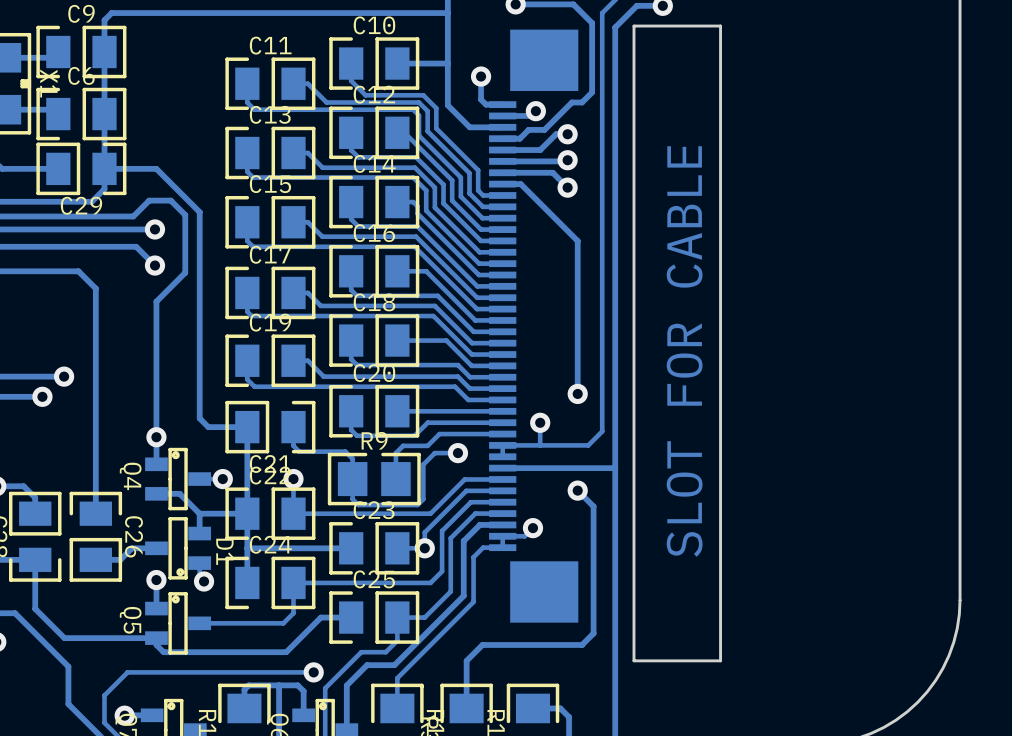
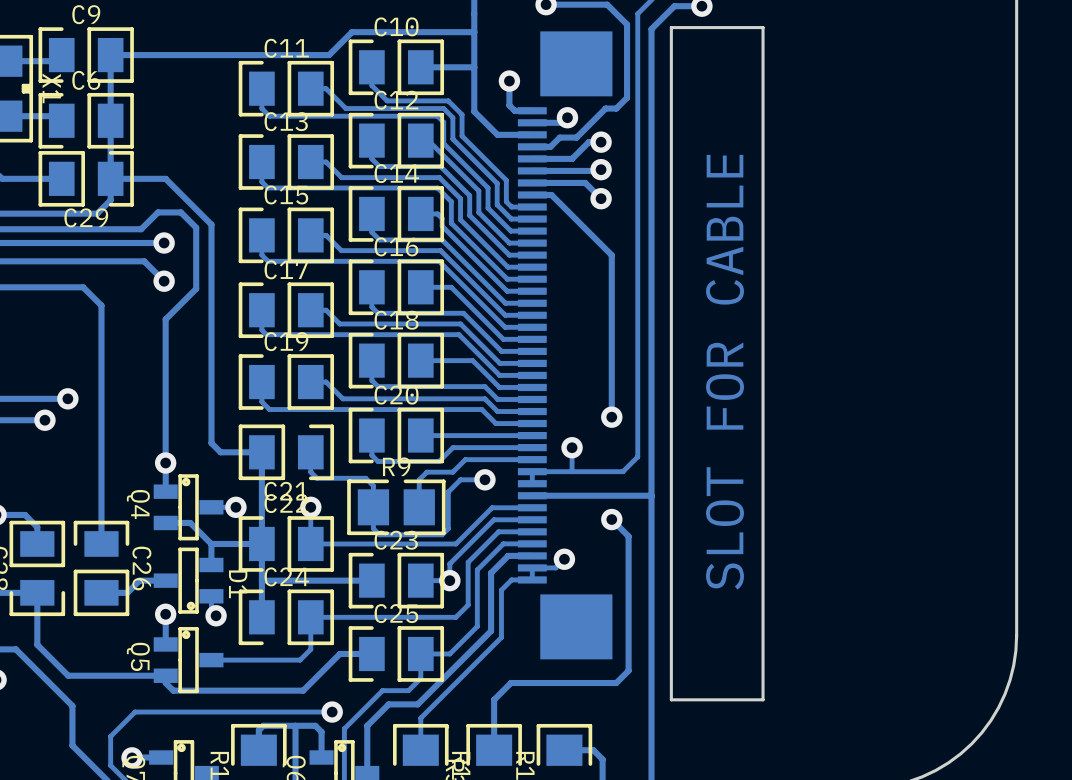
track: (447, 13) (111, 13) (104, 20) (104, 52) -> (474, 32) (352, 32) (329, 55) (110, 55)

